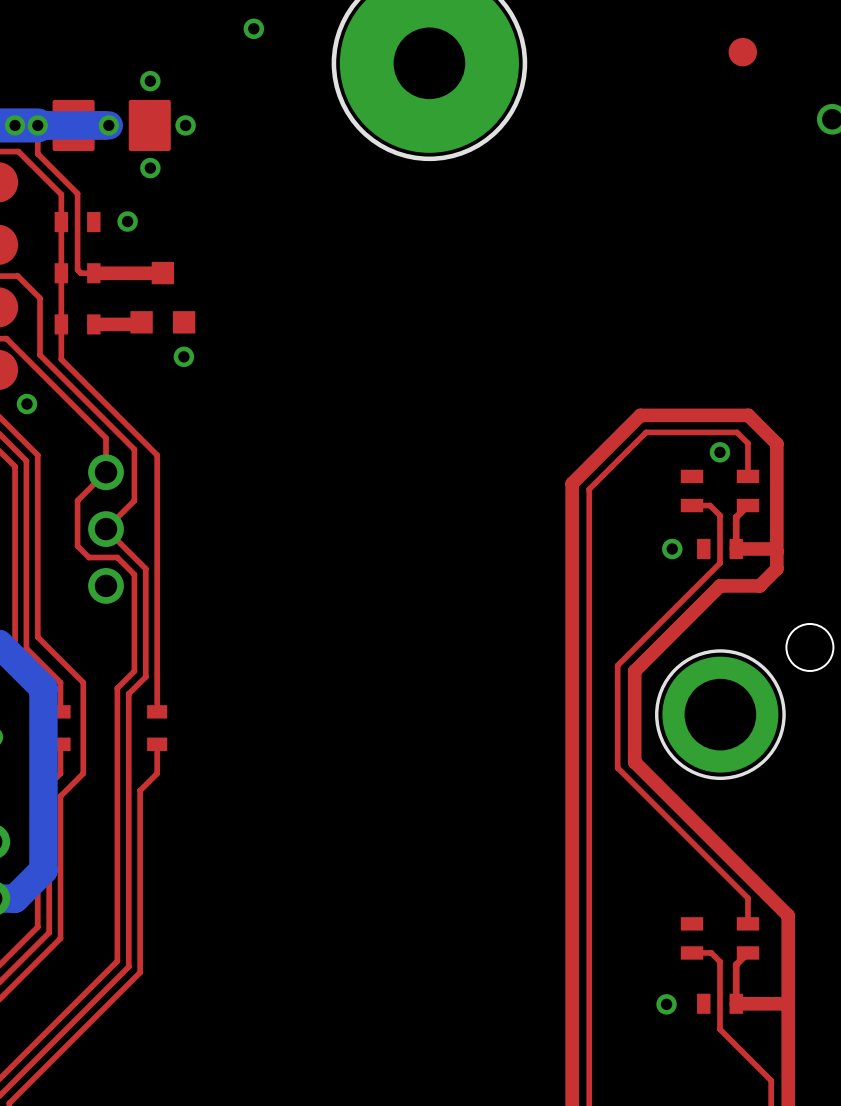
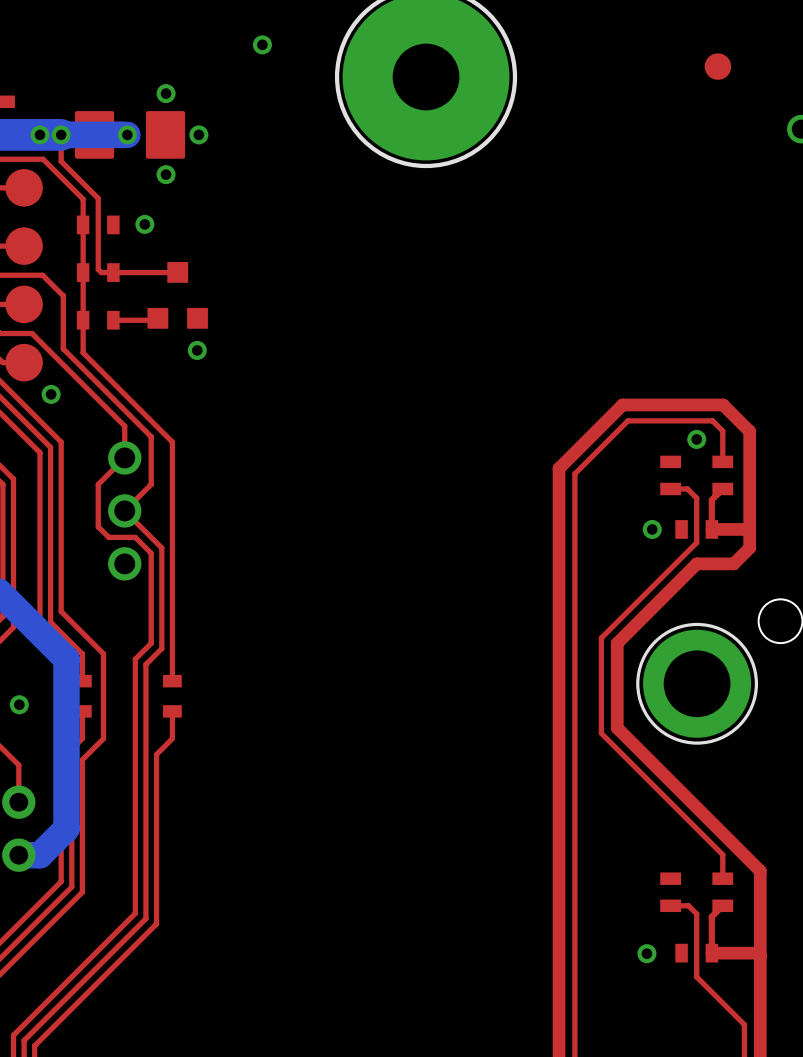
top track width: thick (162, 273) (93, 273) -> thin (177, 272) (113, 272)
top track width: thick (141, 322) (139, 324) (93, 324) -> thin (157, 318) (155, 320) (113, 320)

